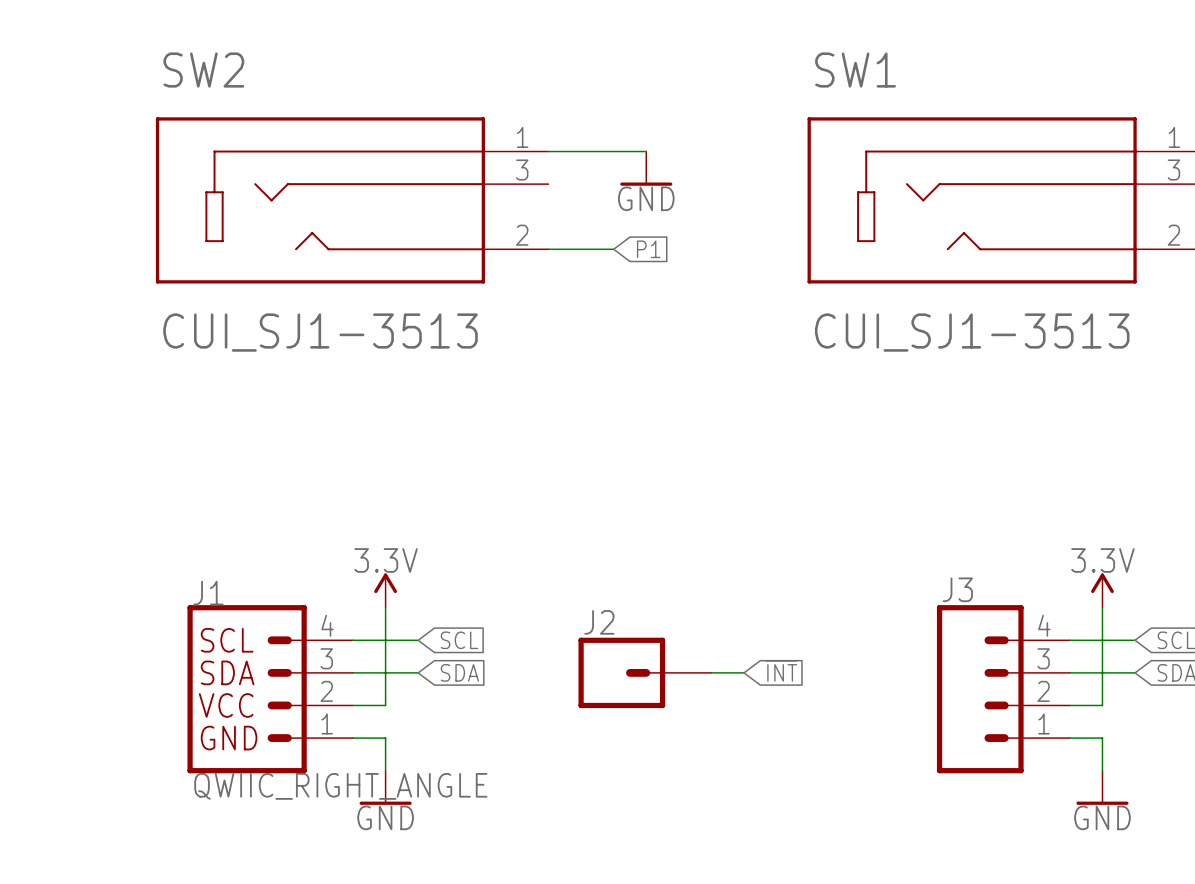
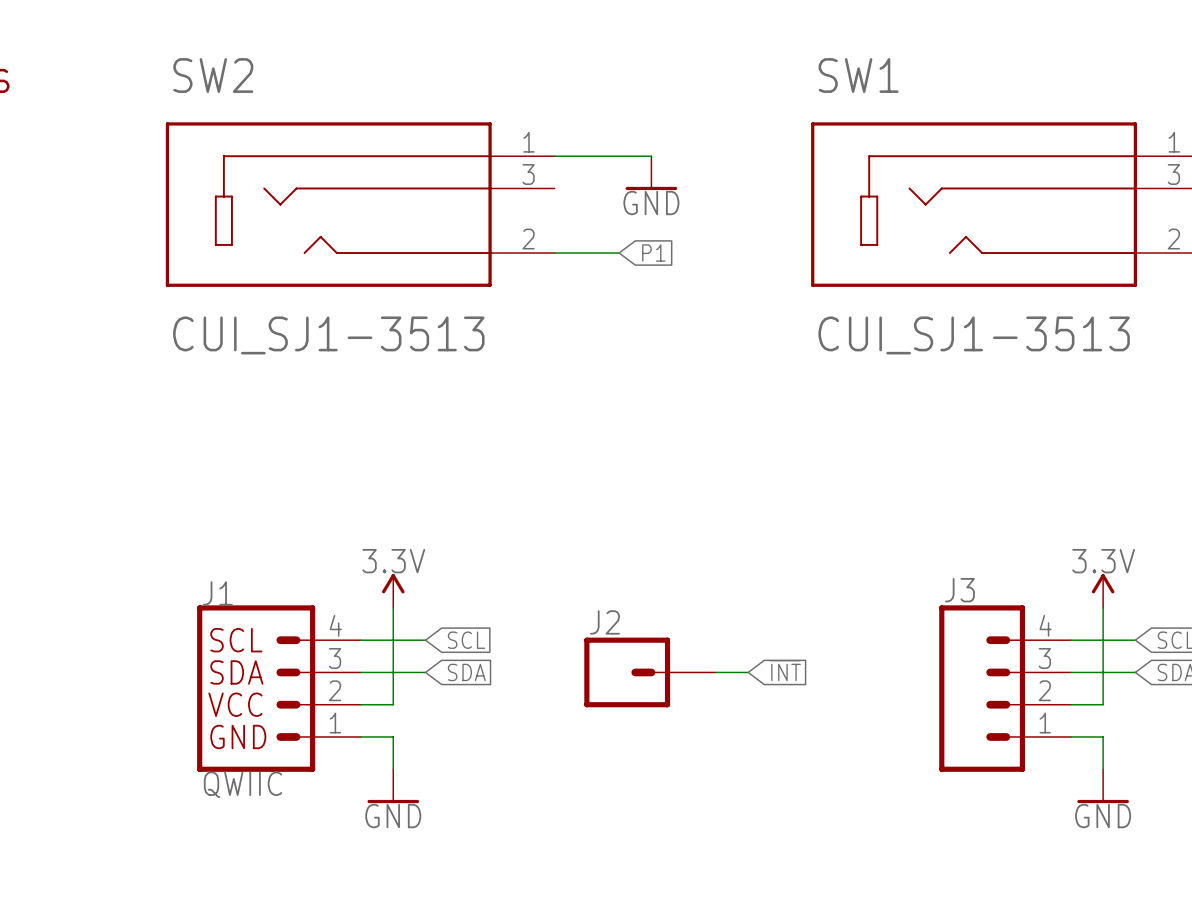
J1 value: QWIIC_RIGHT_ANGLE (340, 786) -> QWIIC (242, 784)

